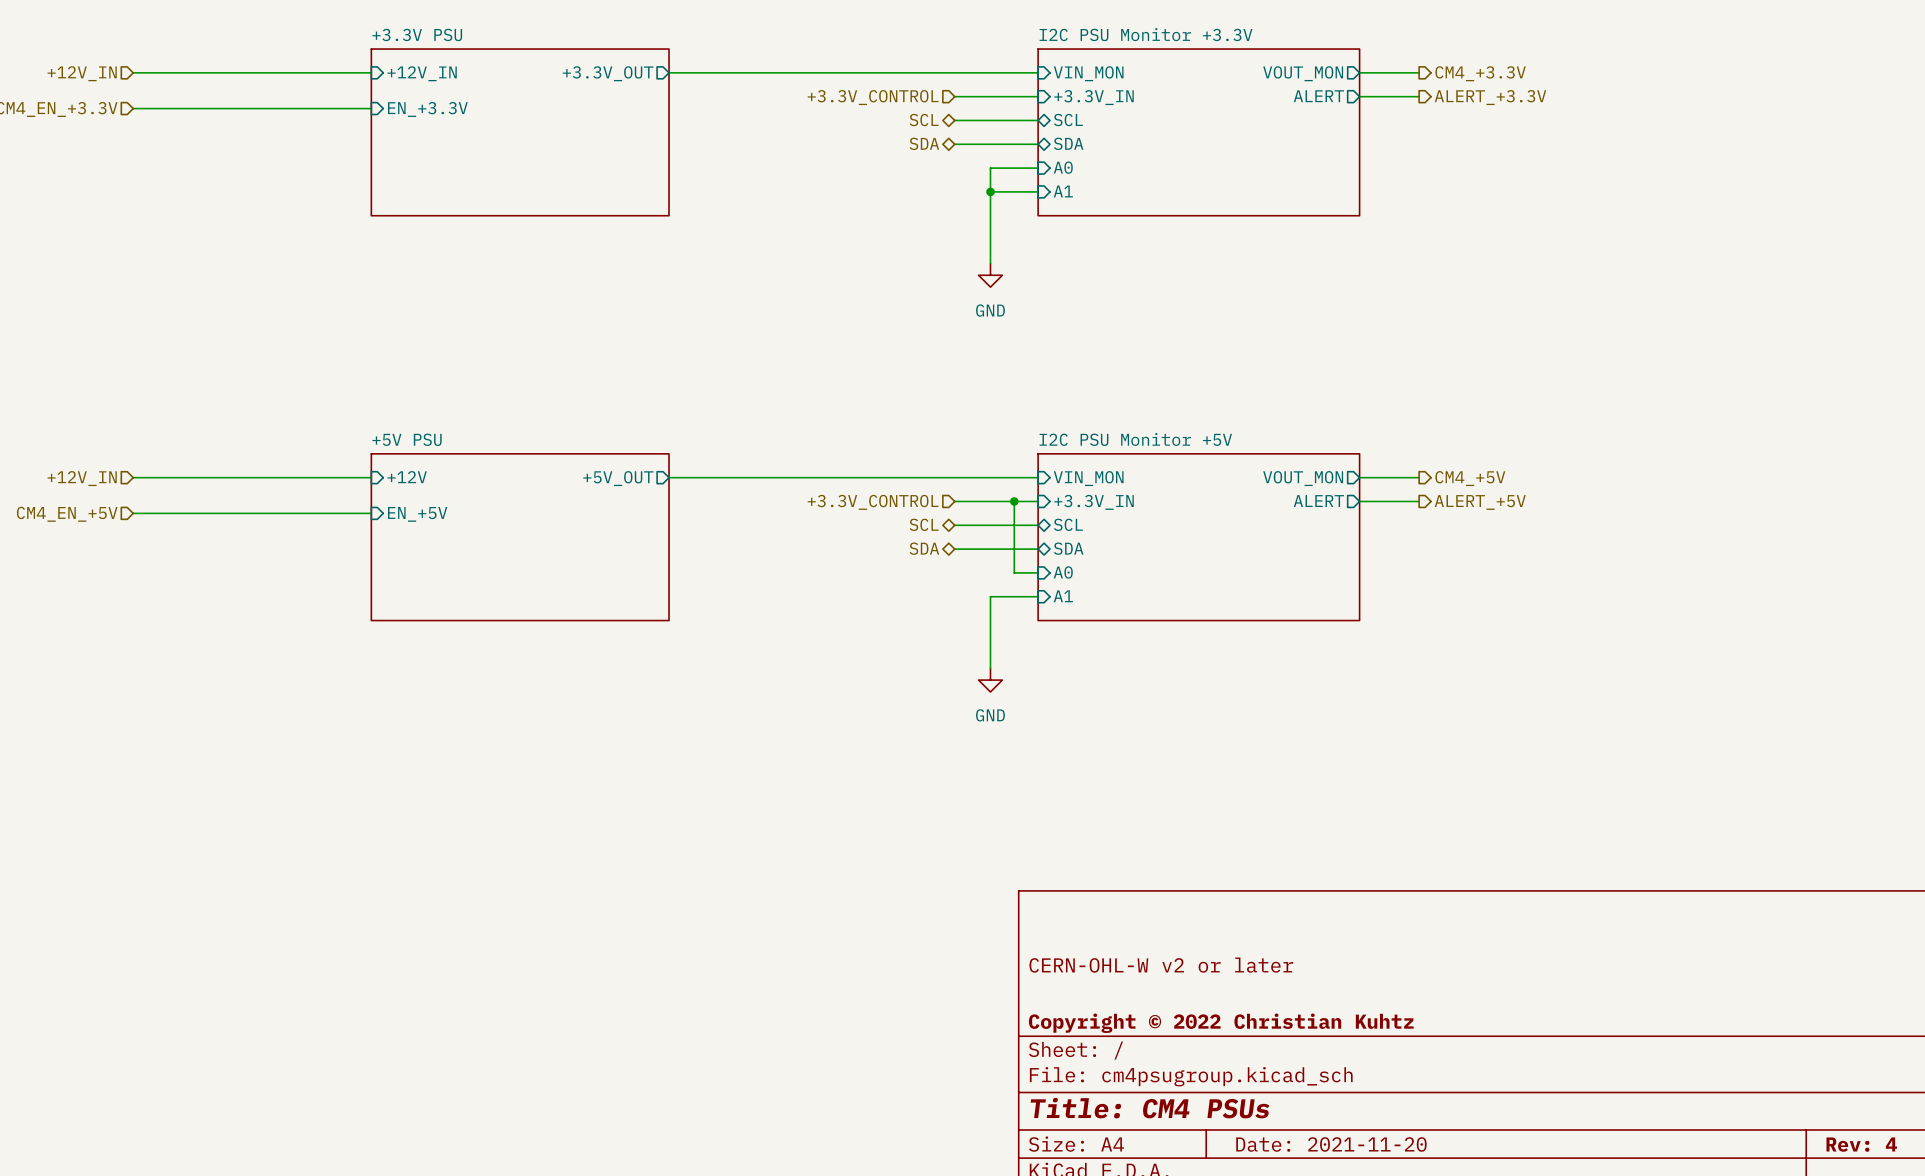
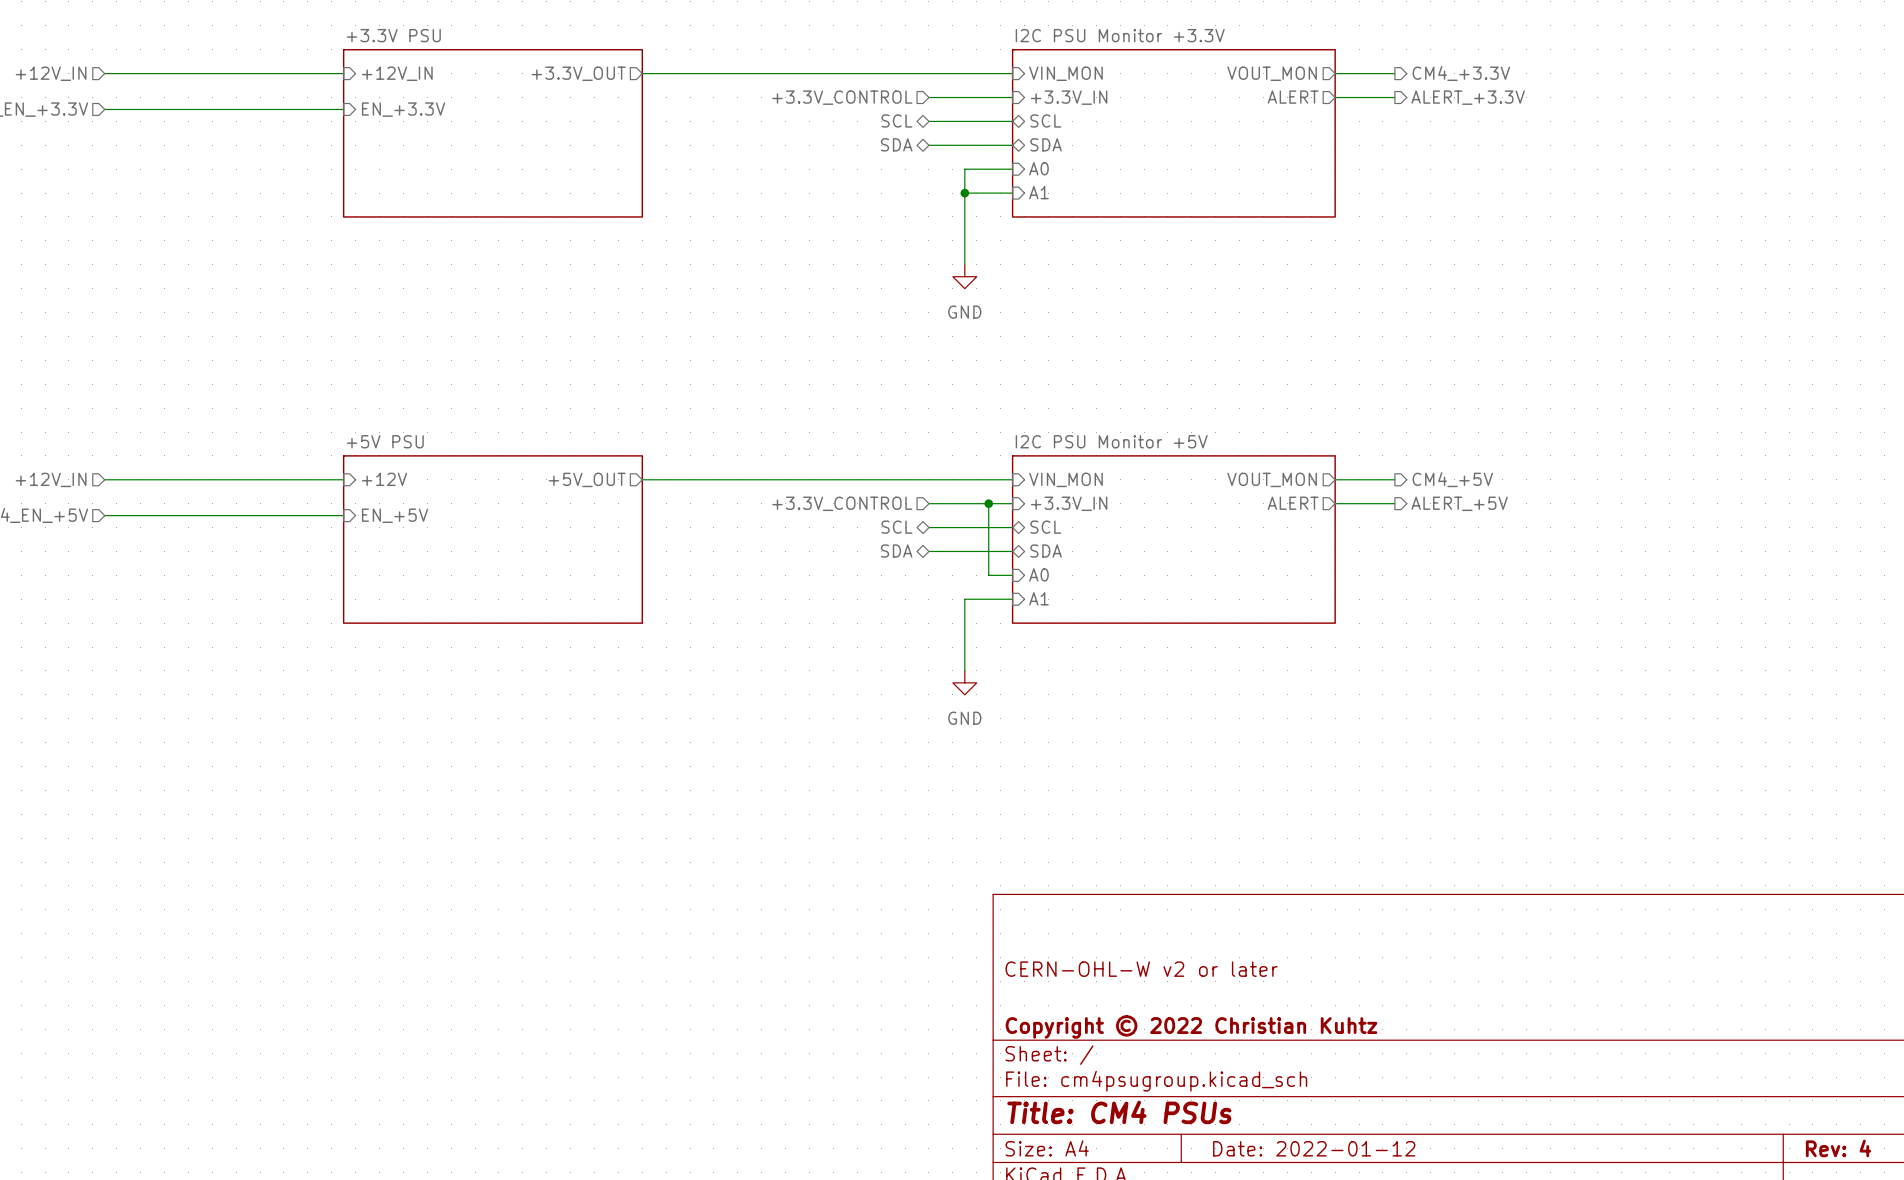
title block: Date: 2021-11-20 (1331, 1144) -> Date: 2022-01-12 (1314, 1148)

